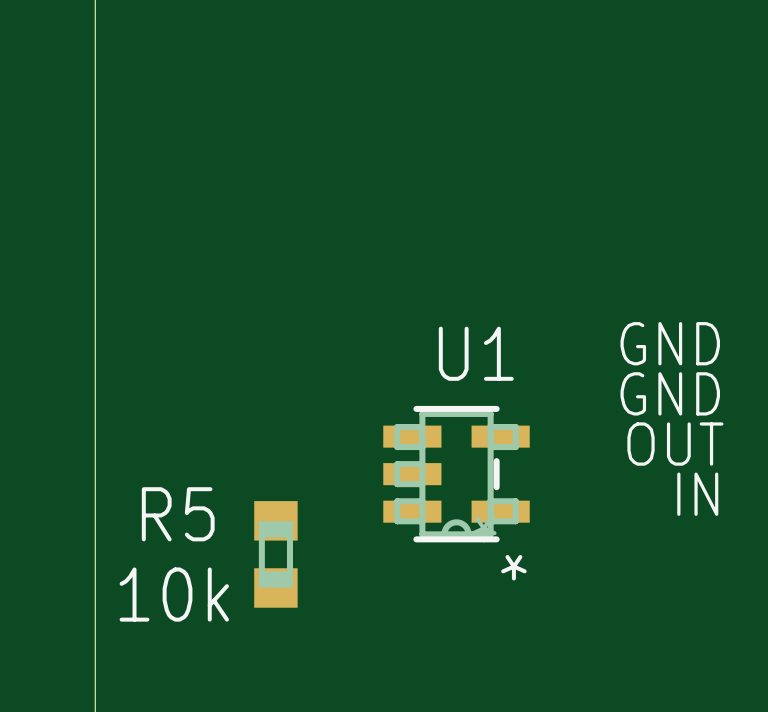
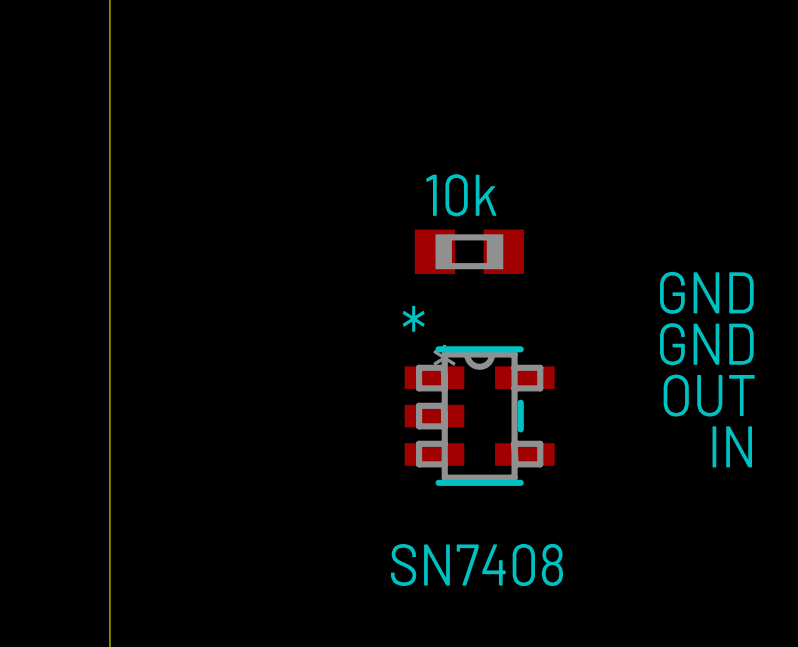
part: none -> 10k (469, 251)
SN7408: none -> (479, 416)
U1: (456, 474) -> none
R5: 10k (275, 554) -> none

